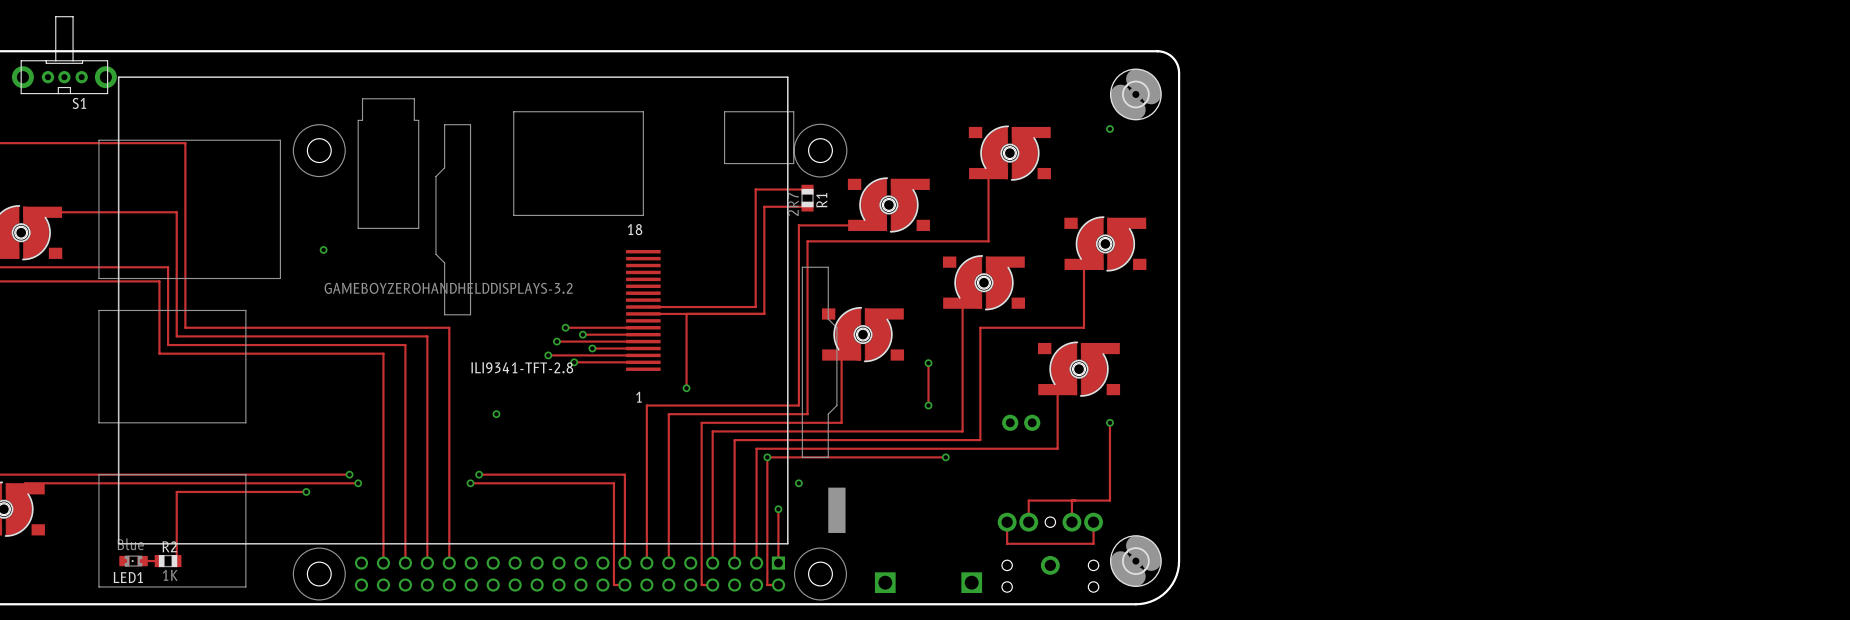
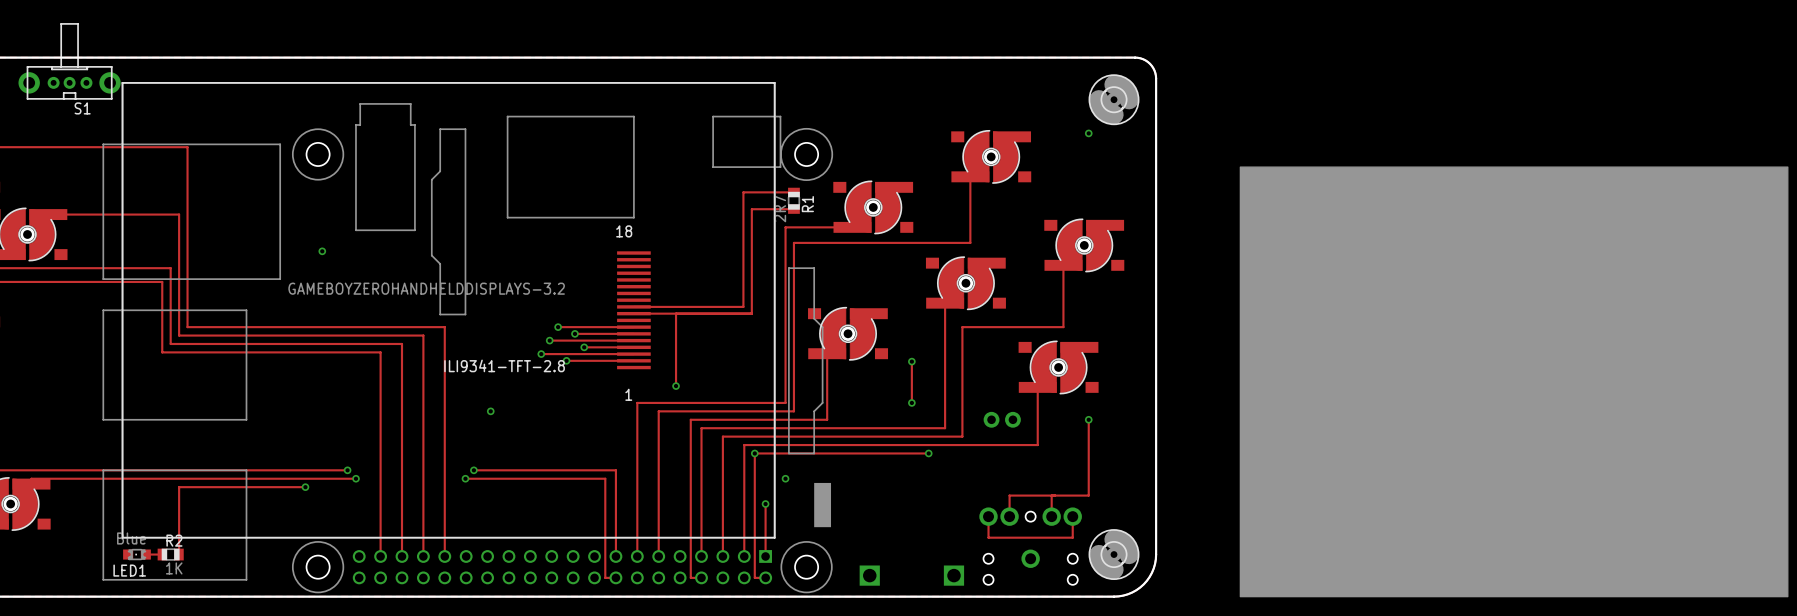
drawing: none -> [1239, 166, 1789, 598]

